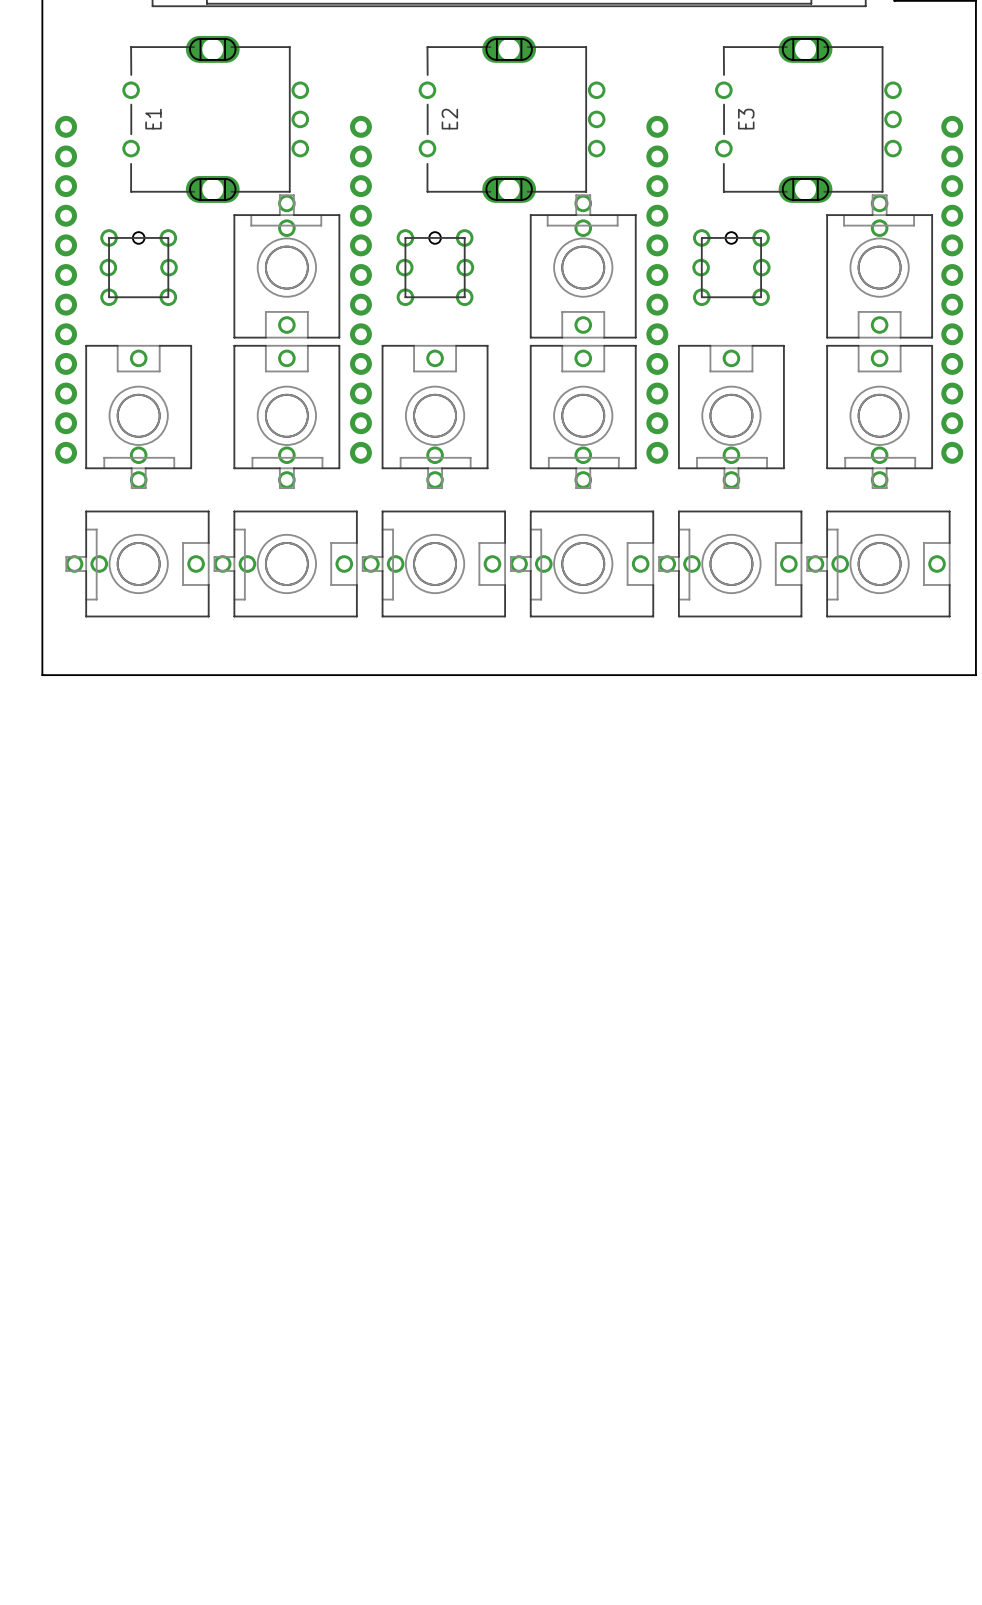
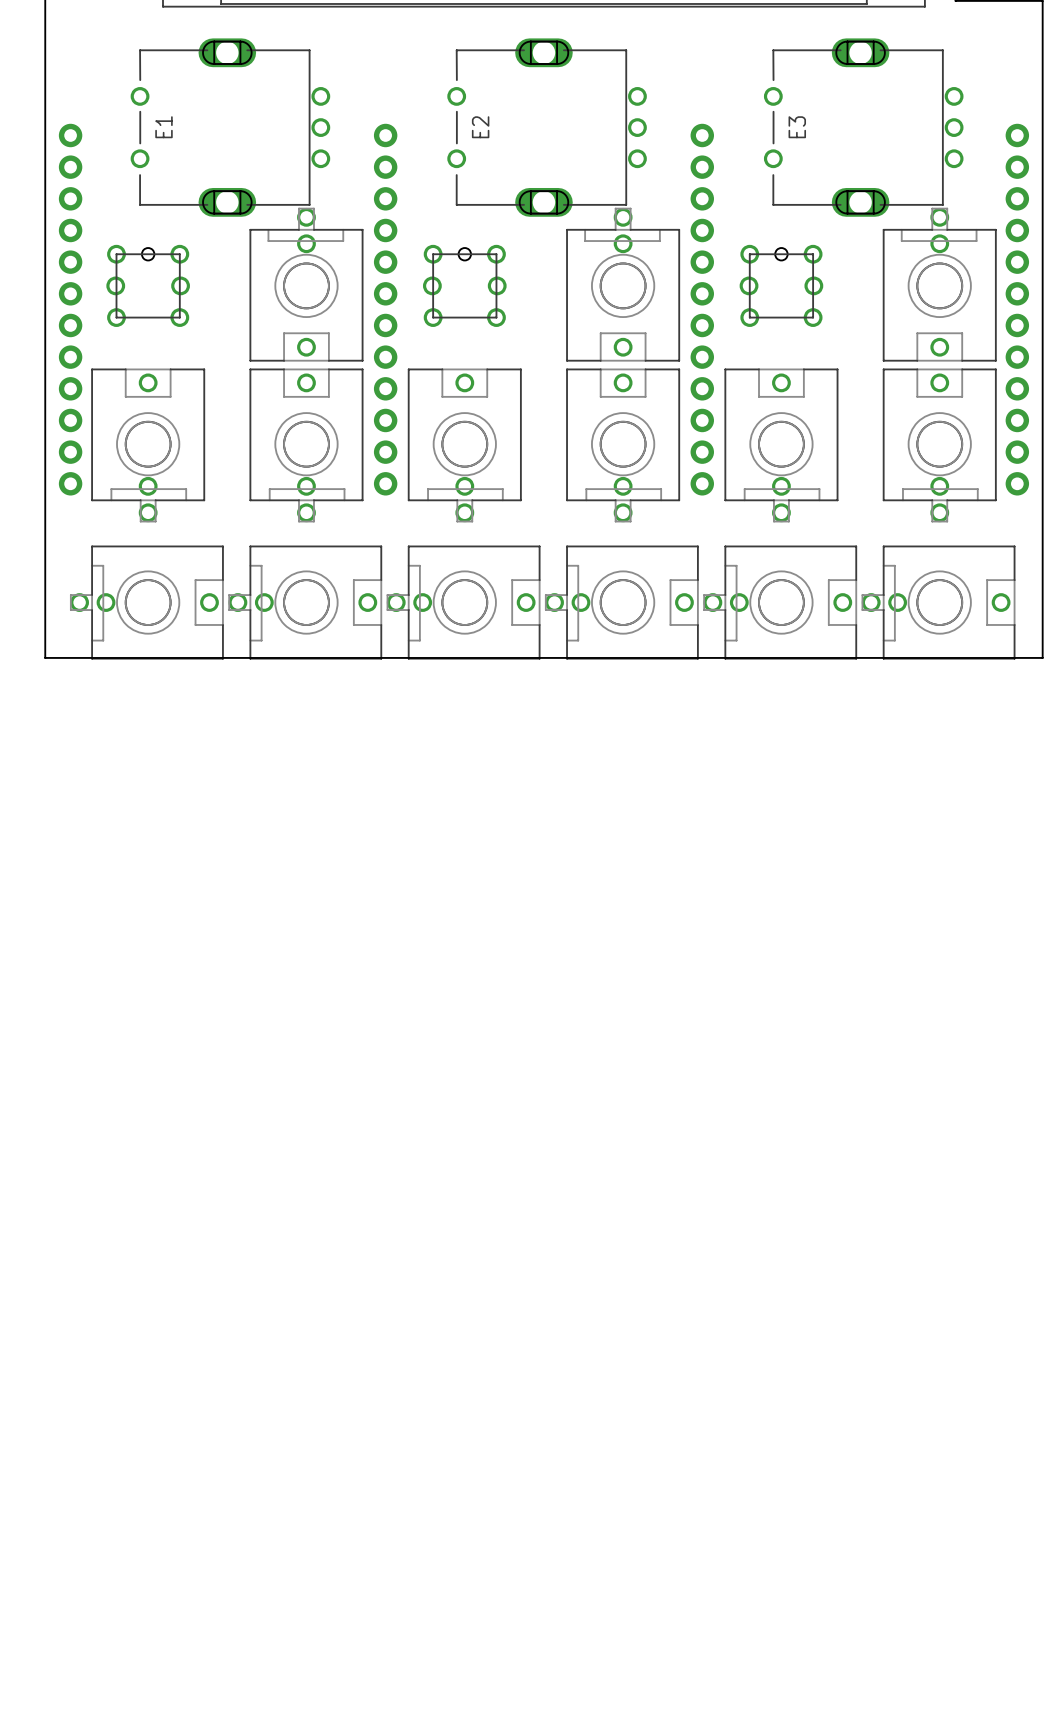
board edge: (42, 615) (42, 675) (975, 675) (975, 615) -> (45, 657) (1042, 657)

